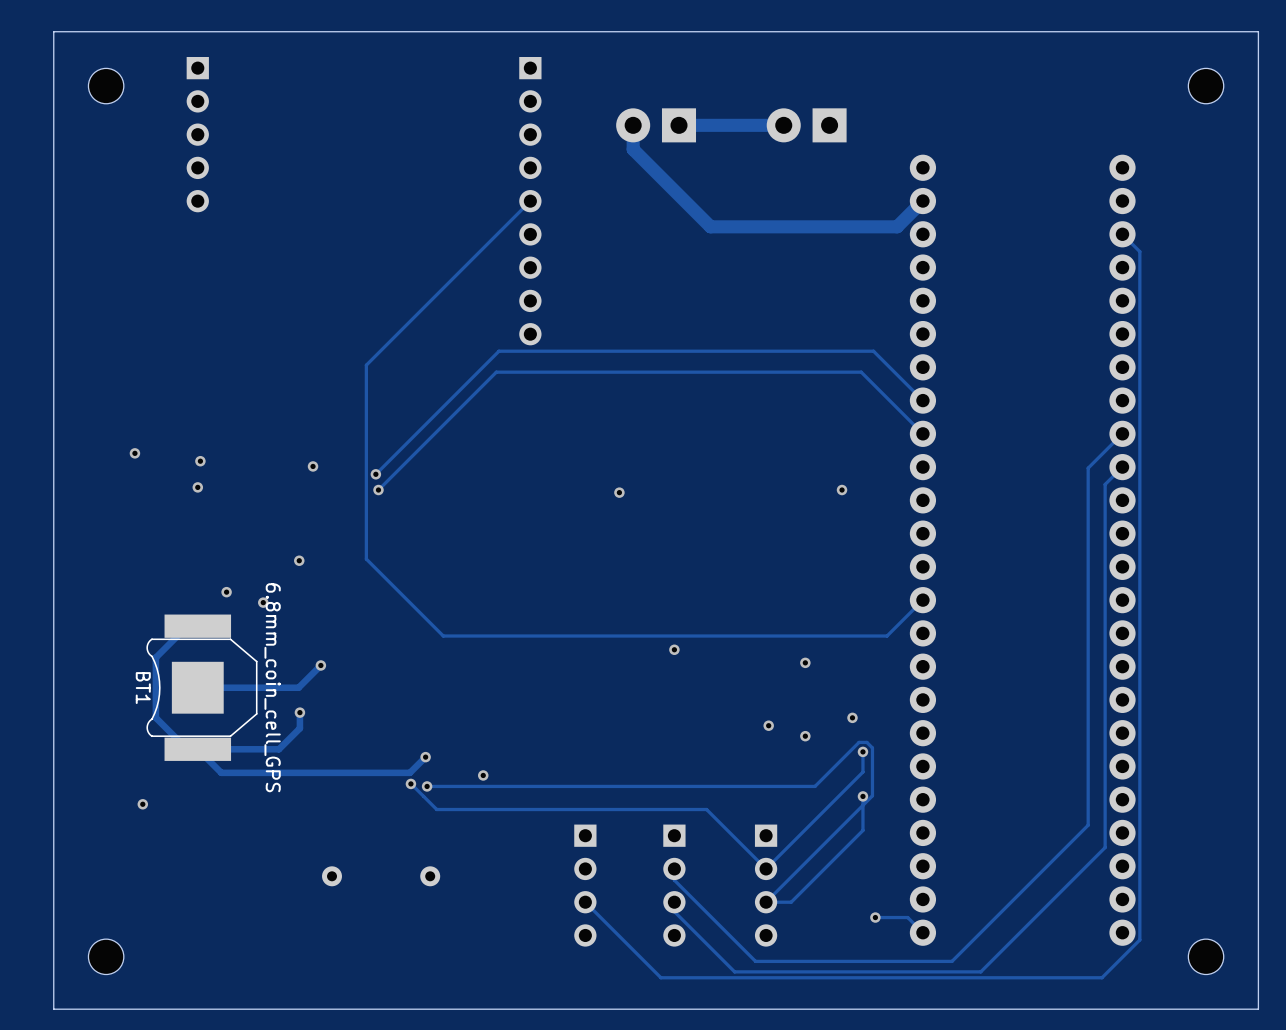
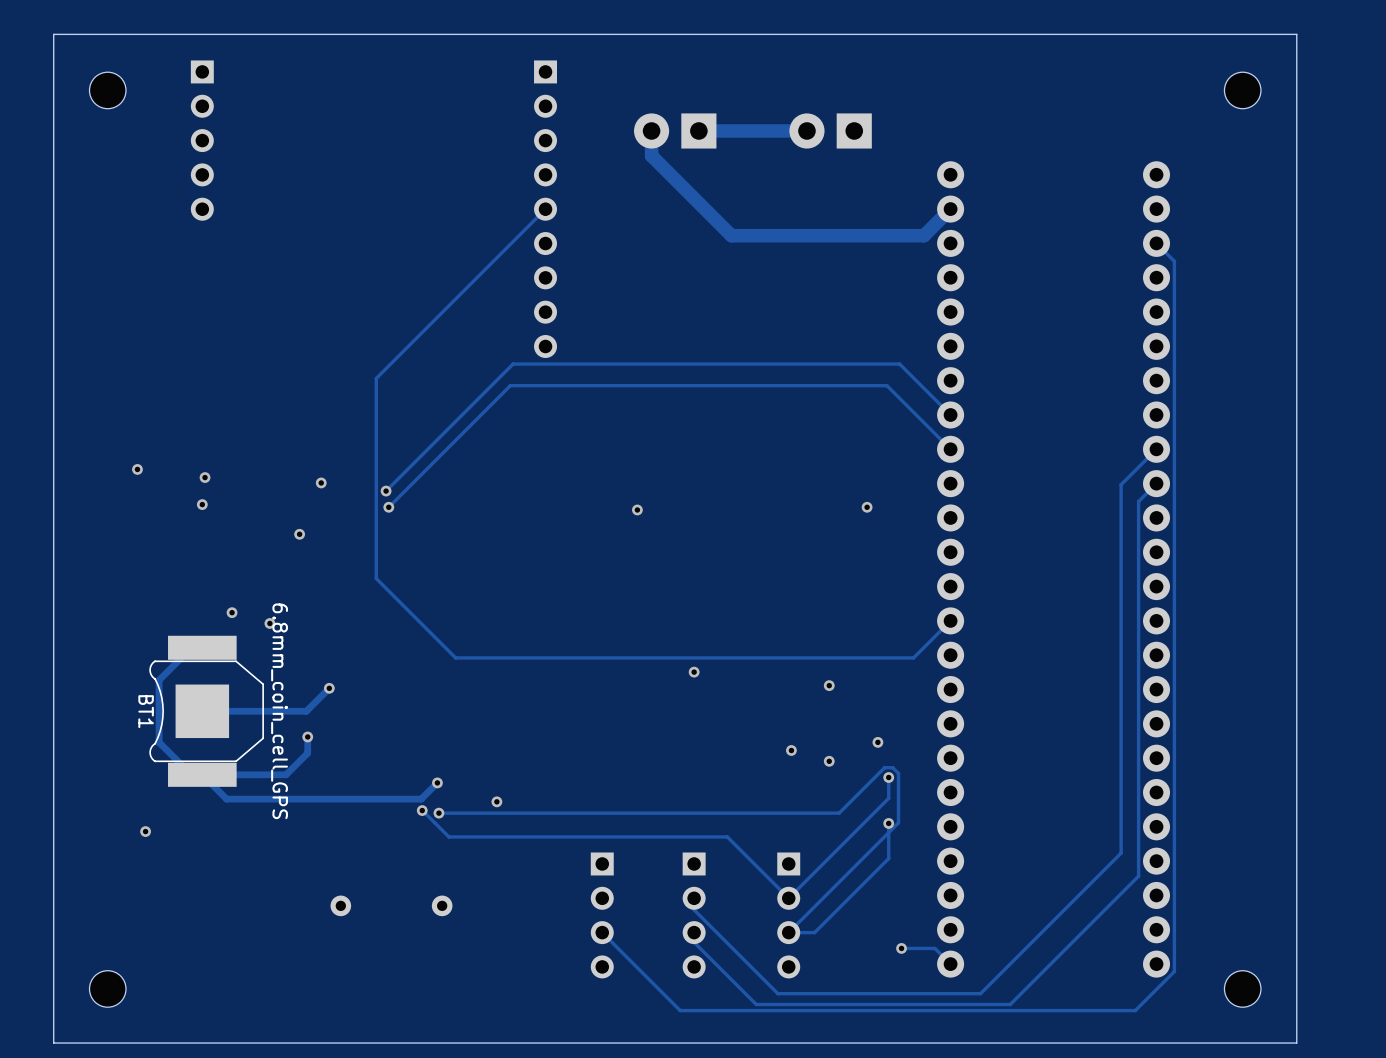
via position: (299, 560) -> (299, 534)

